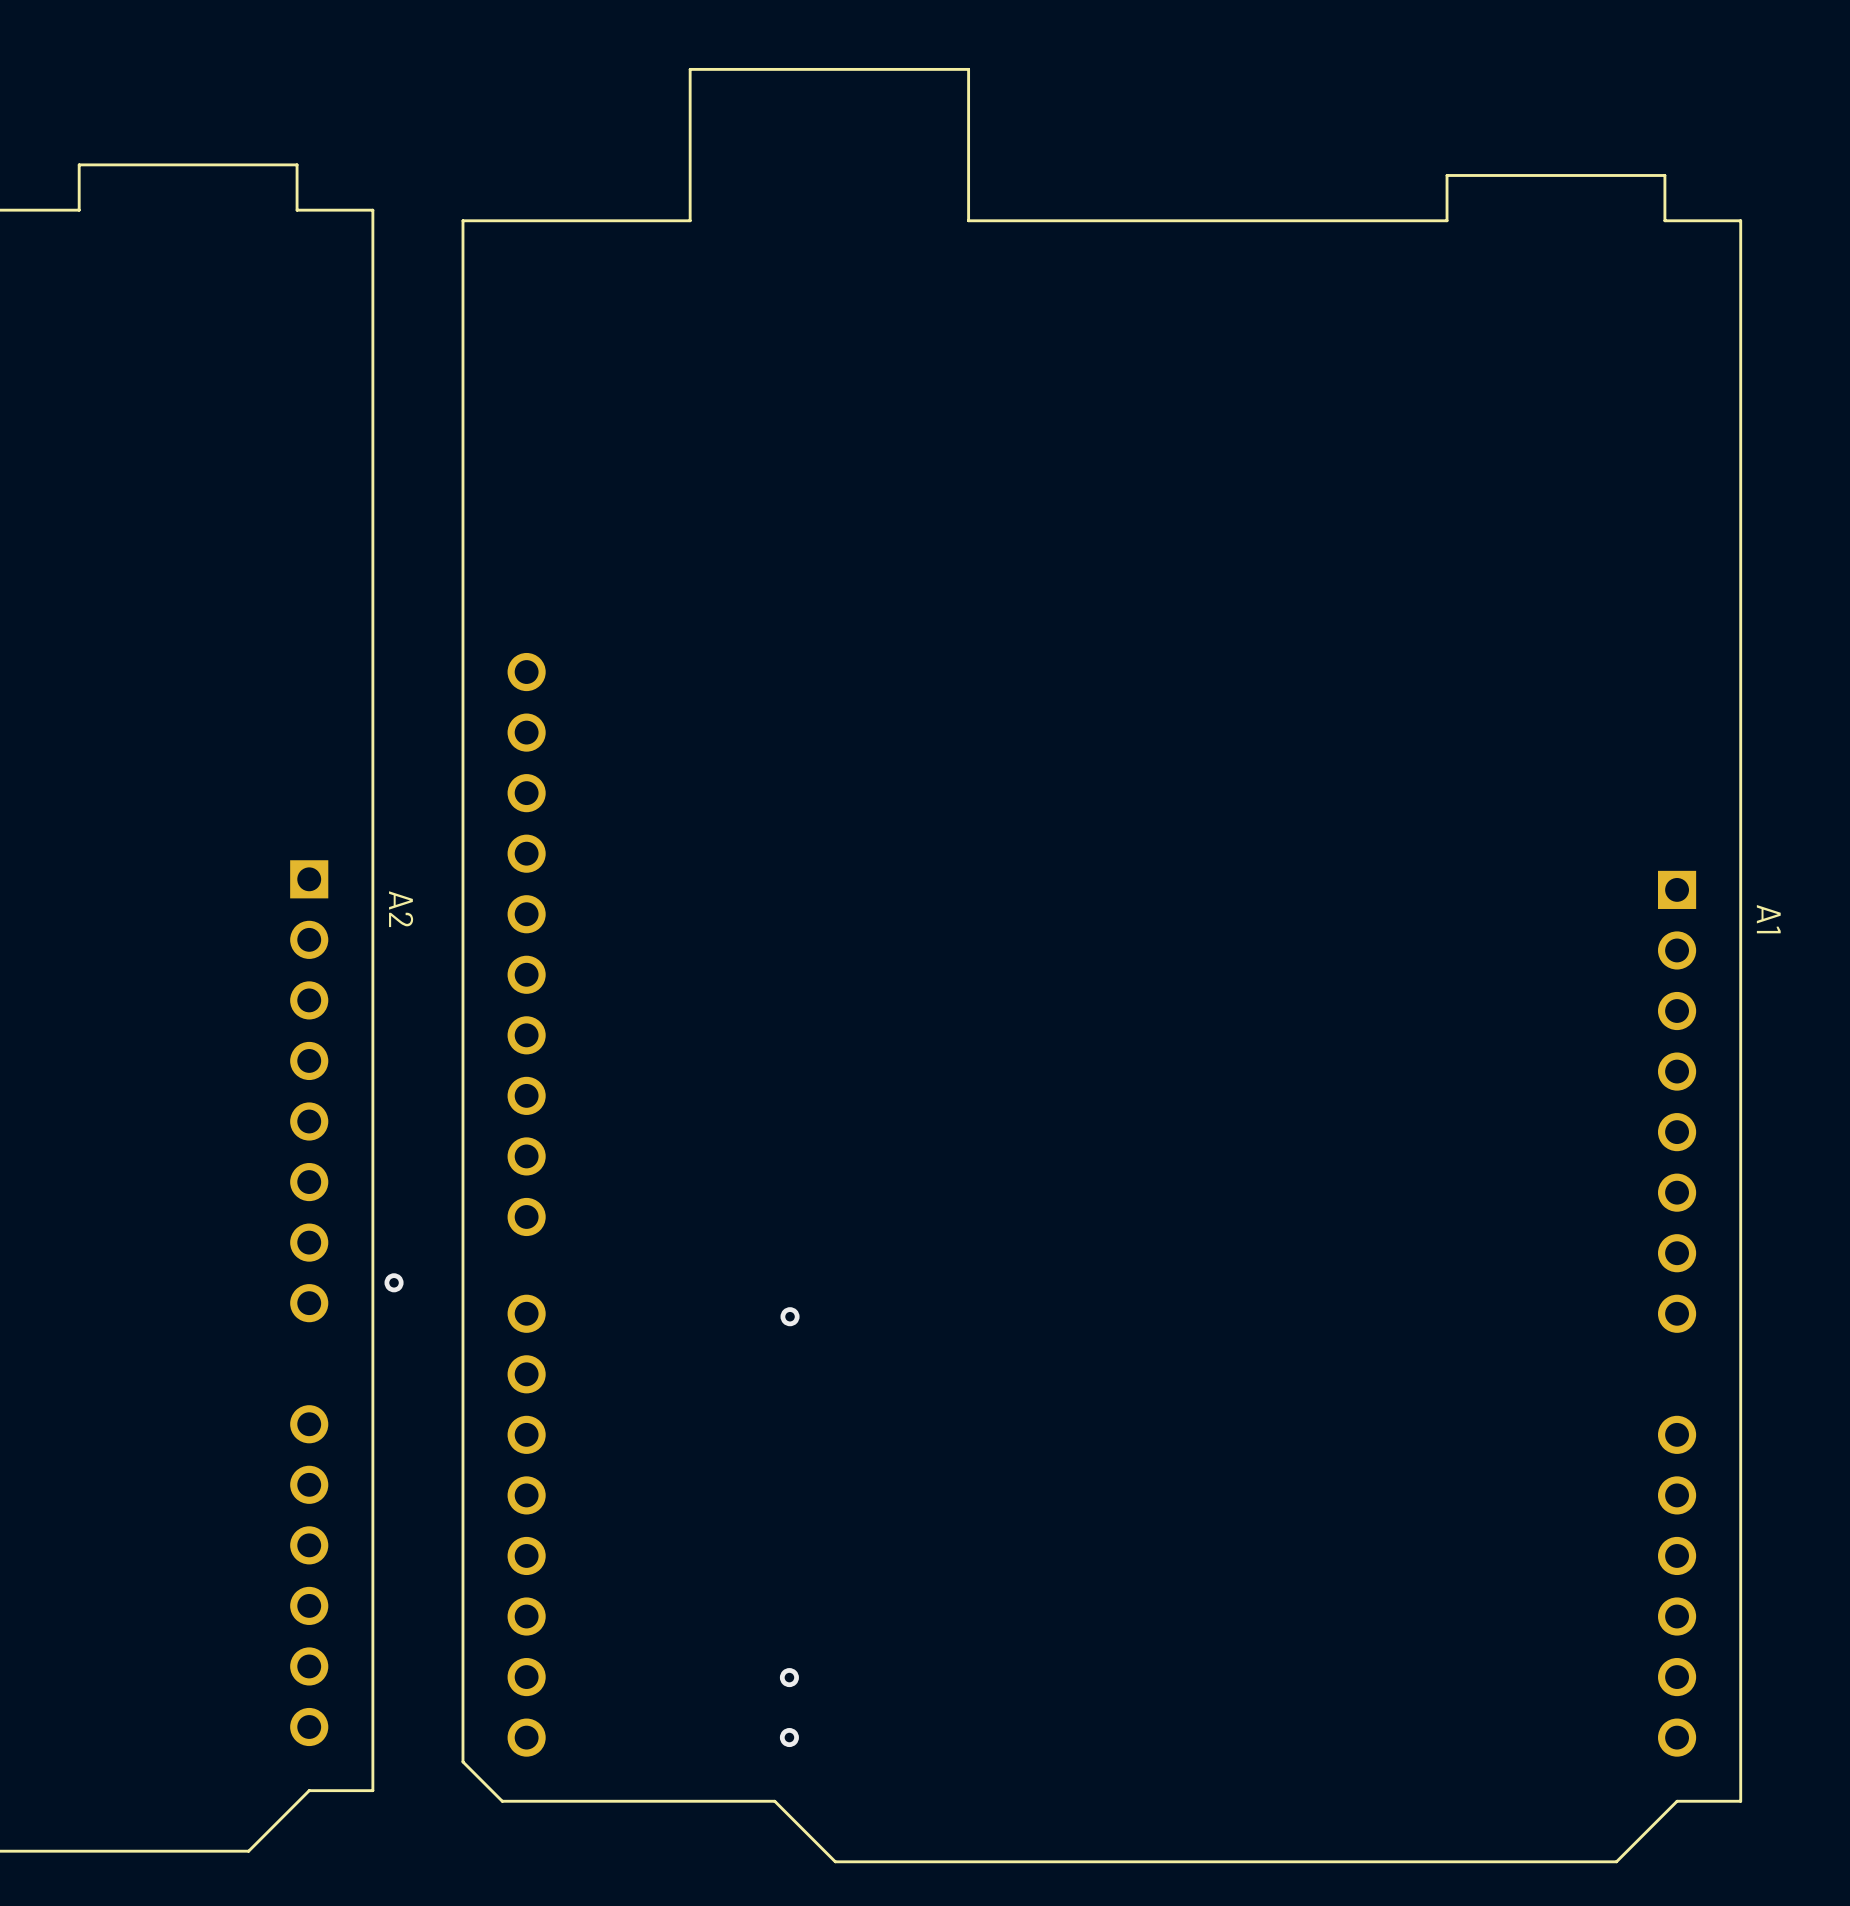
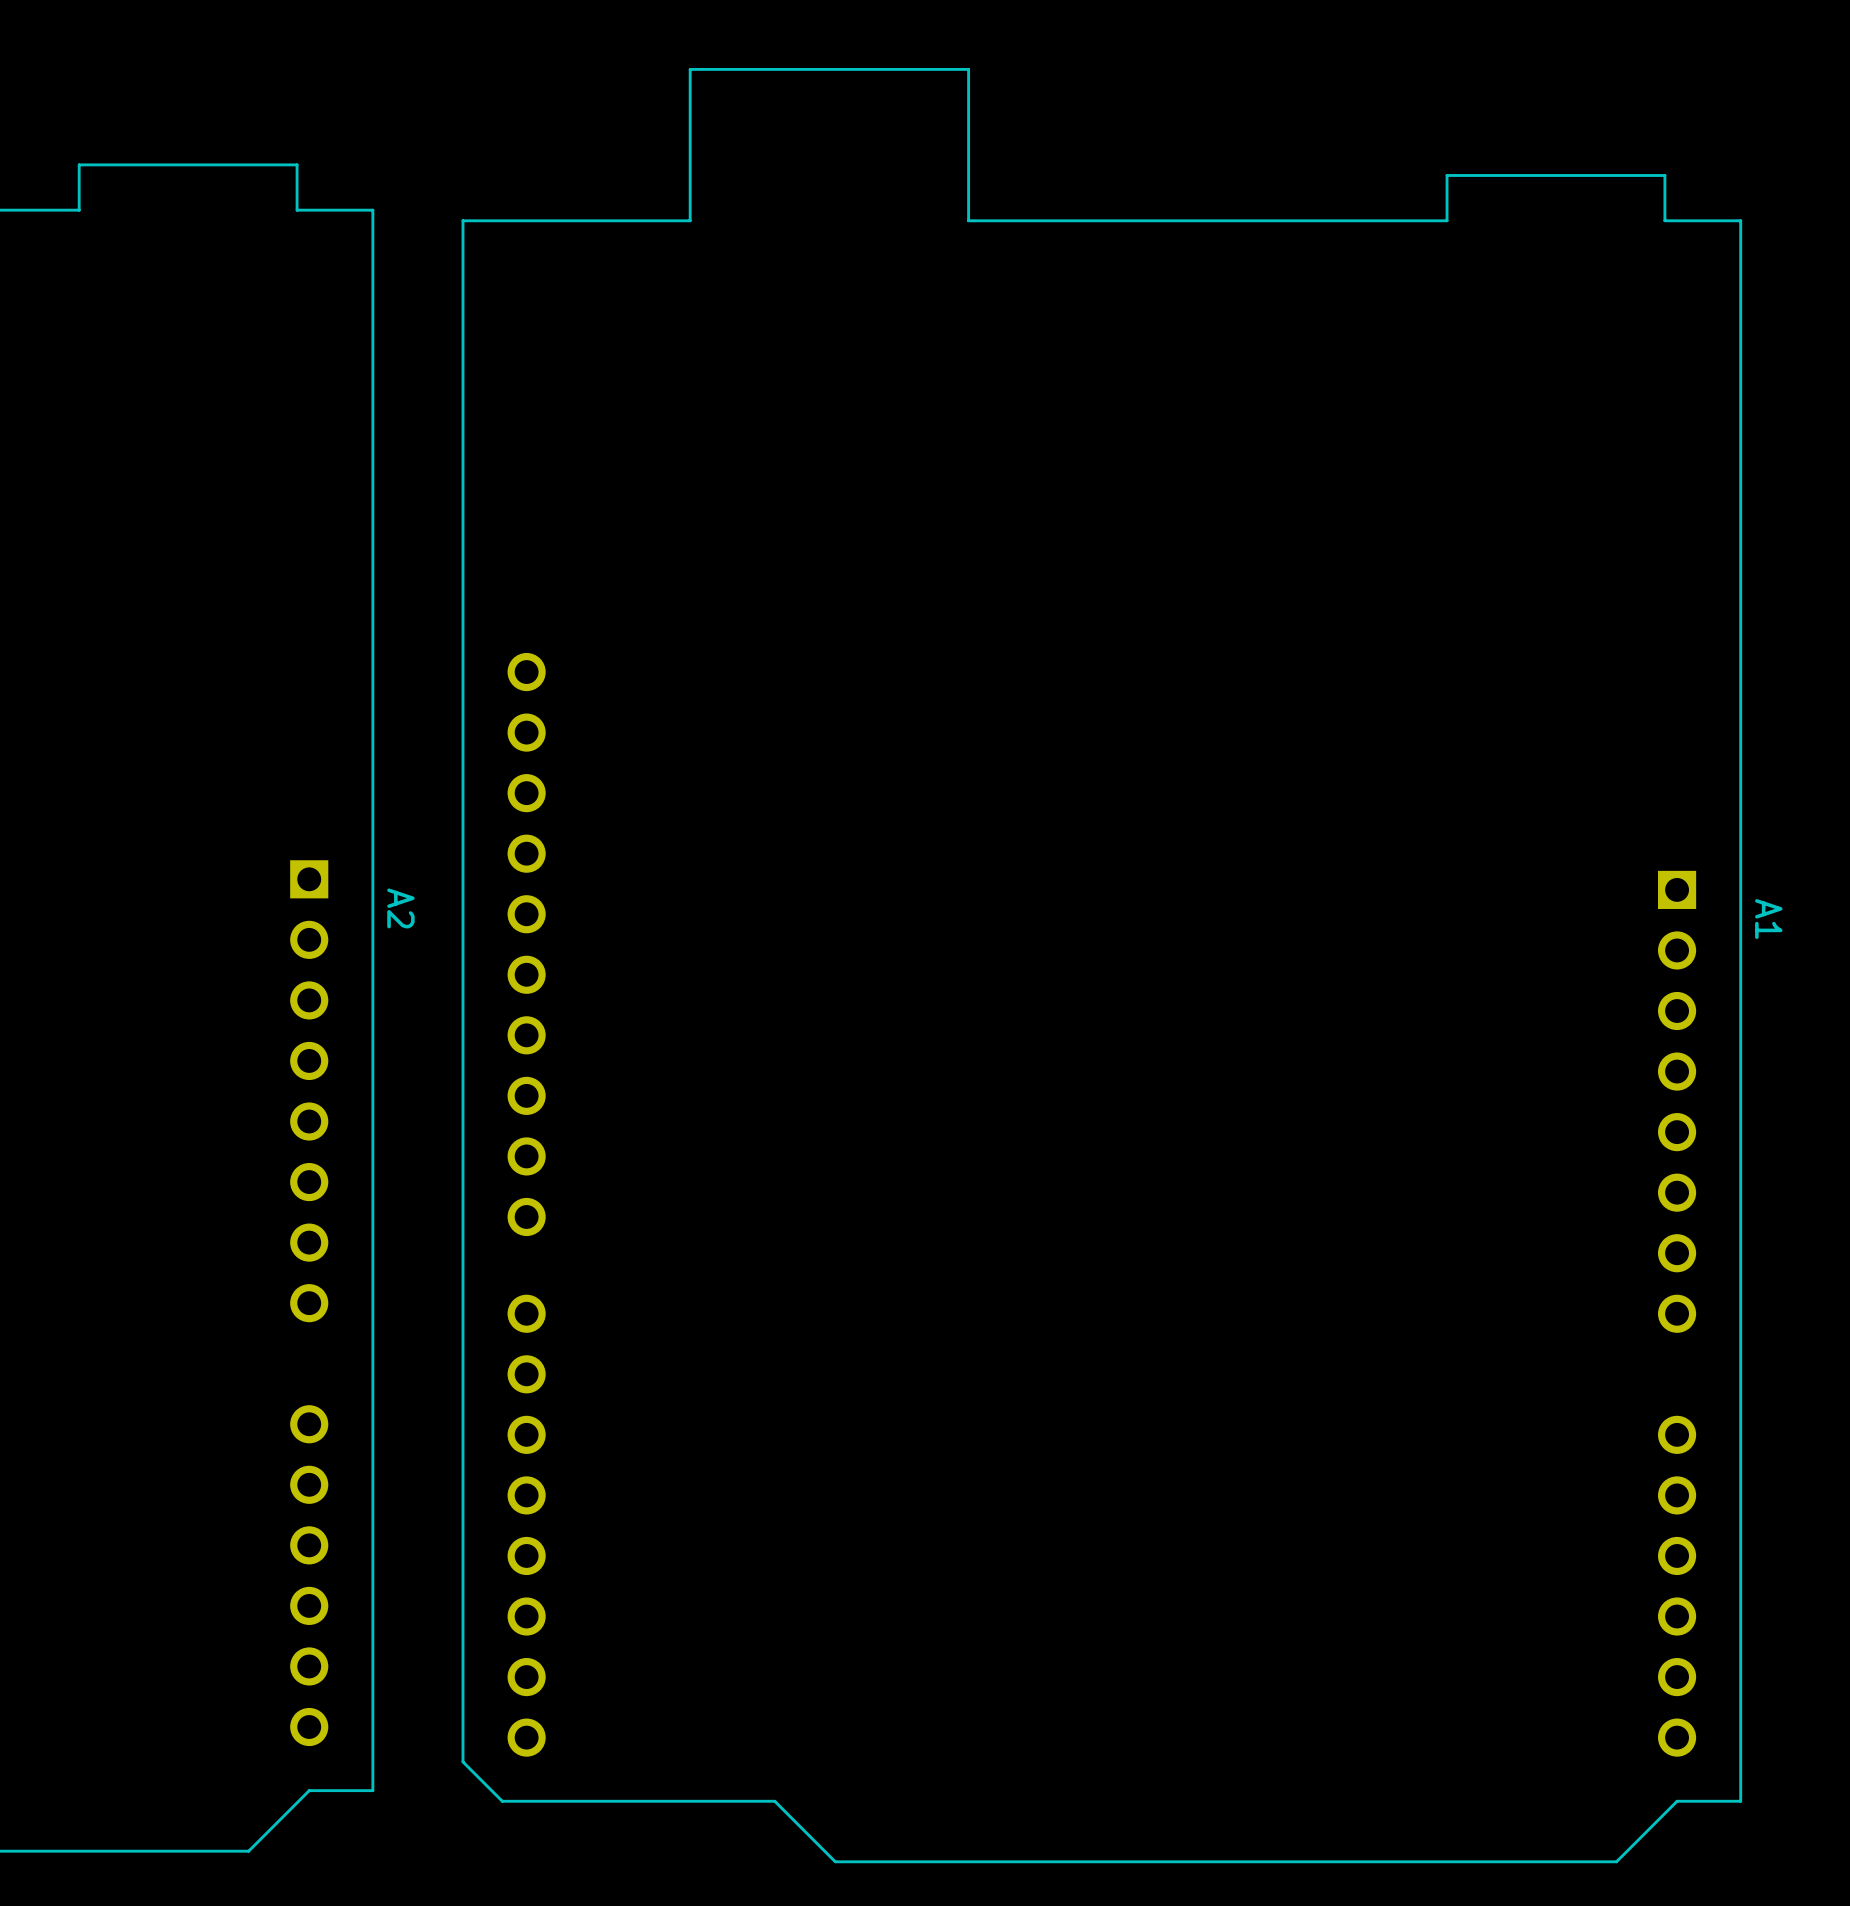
via: (394, 1282) -> none
via: (790, 1316) -> none
via: (789, 1677) -> none
via: (789, 1737) -> none

